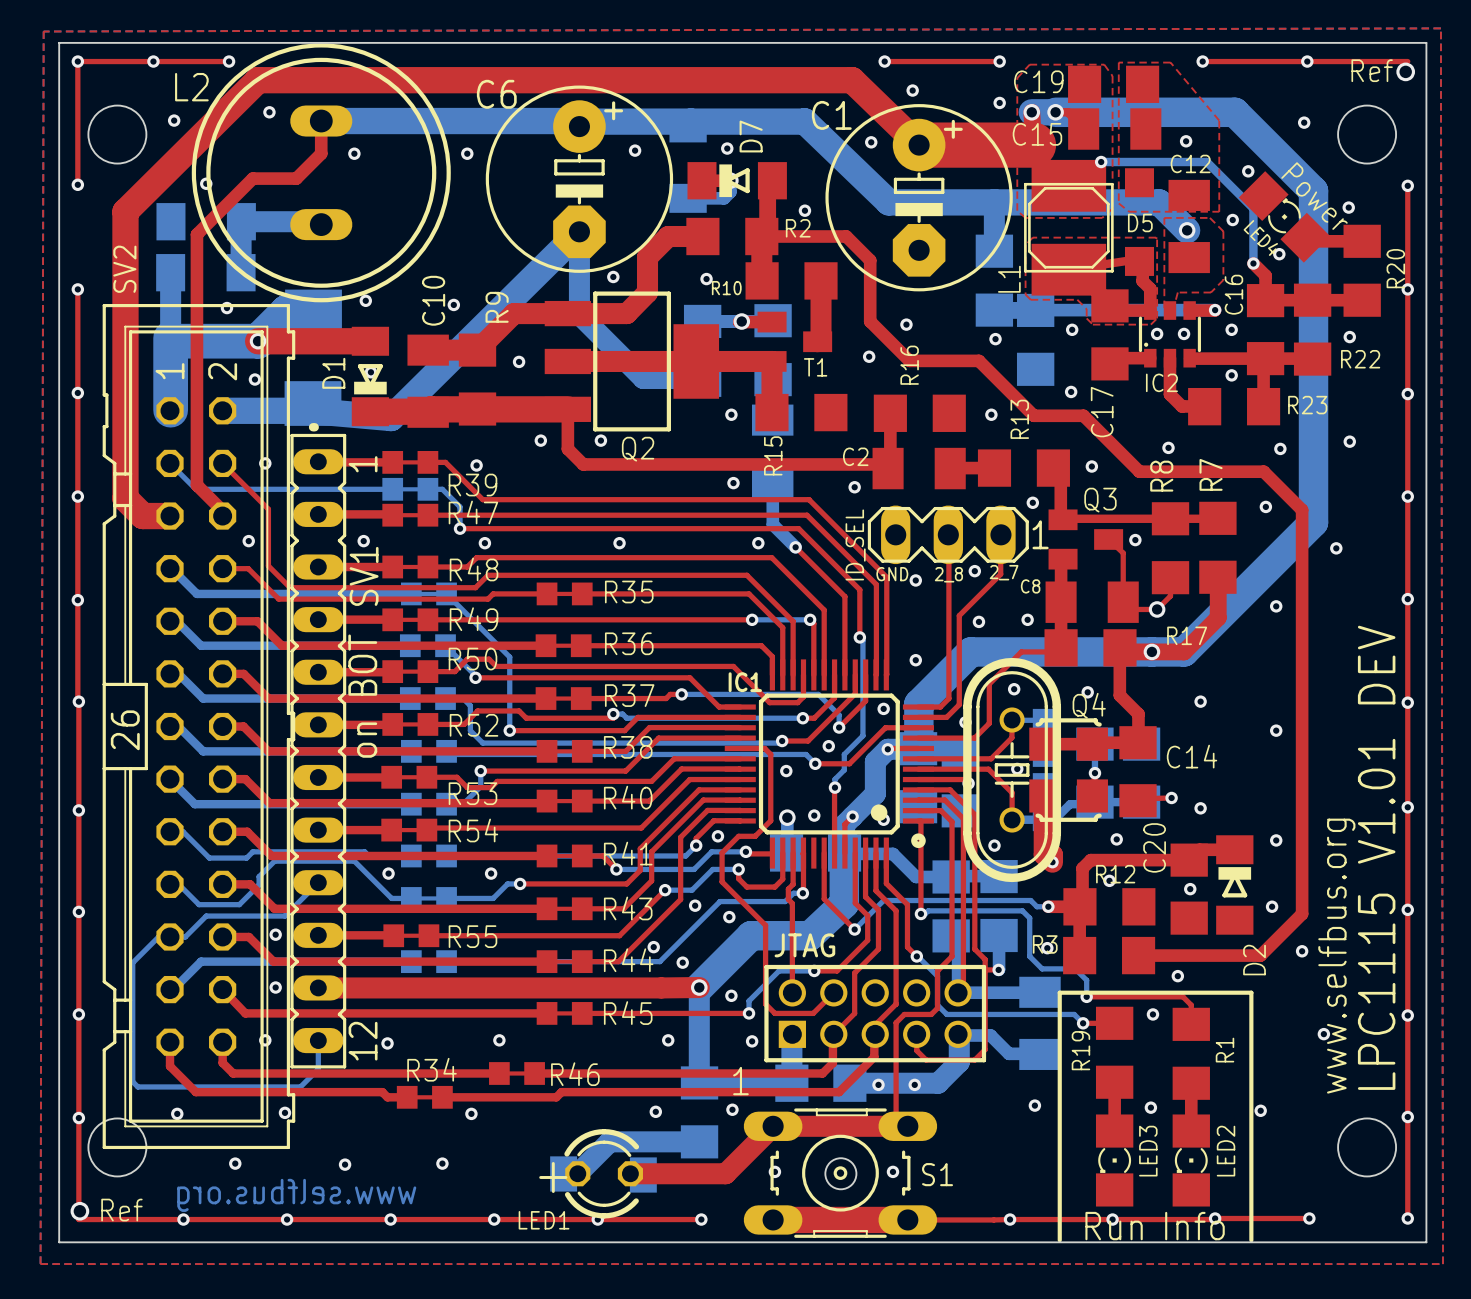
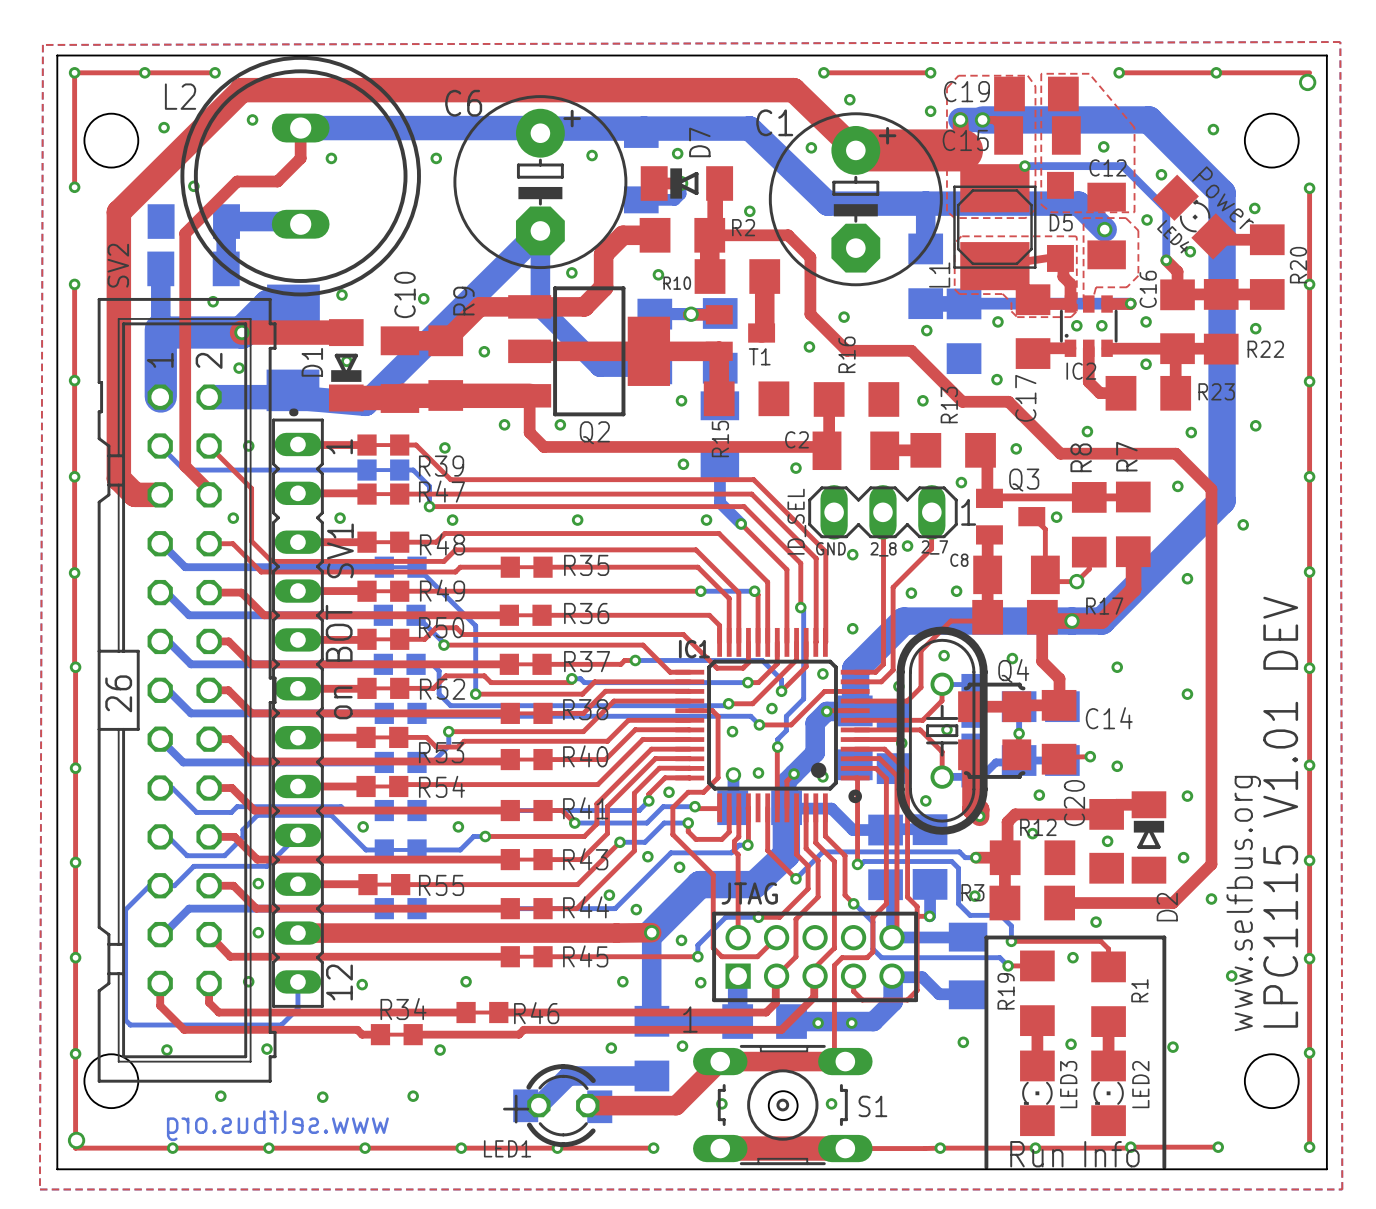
text: Ref (1372, 70) -> none
text: Ref (121, 1210) -> none

